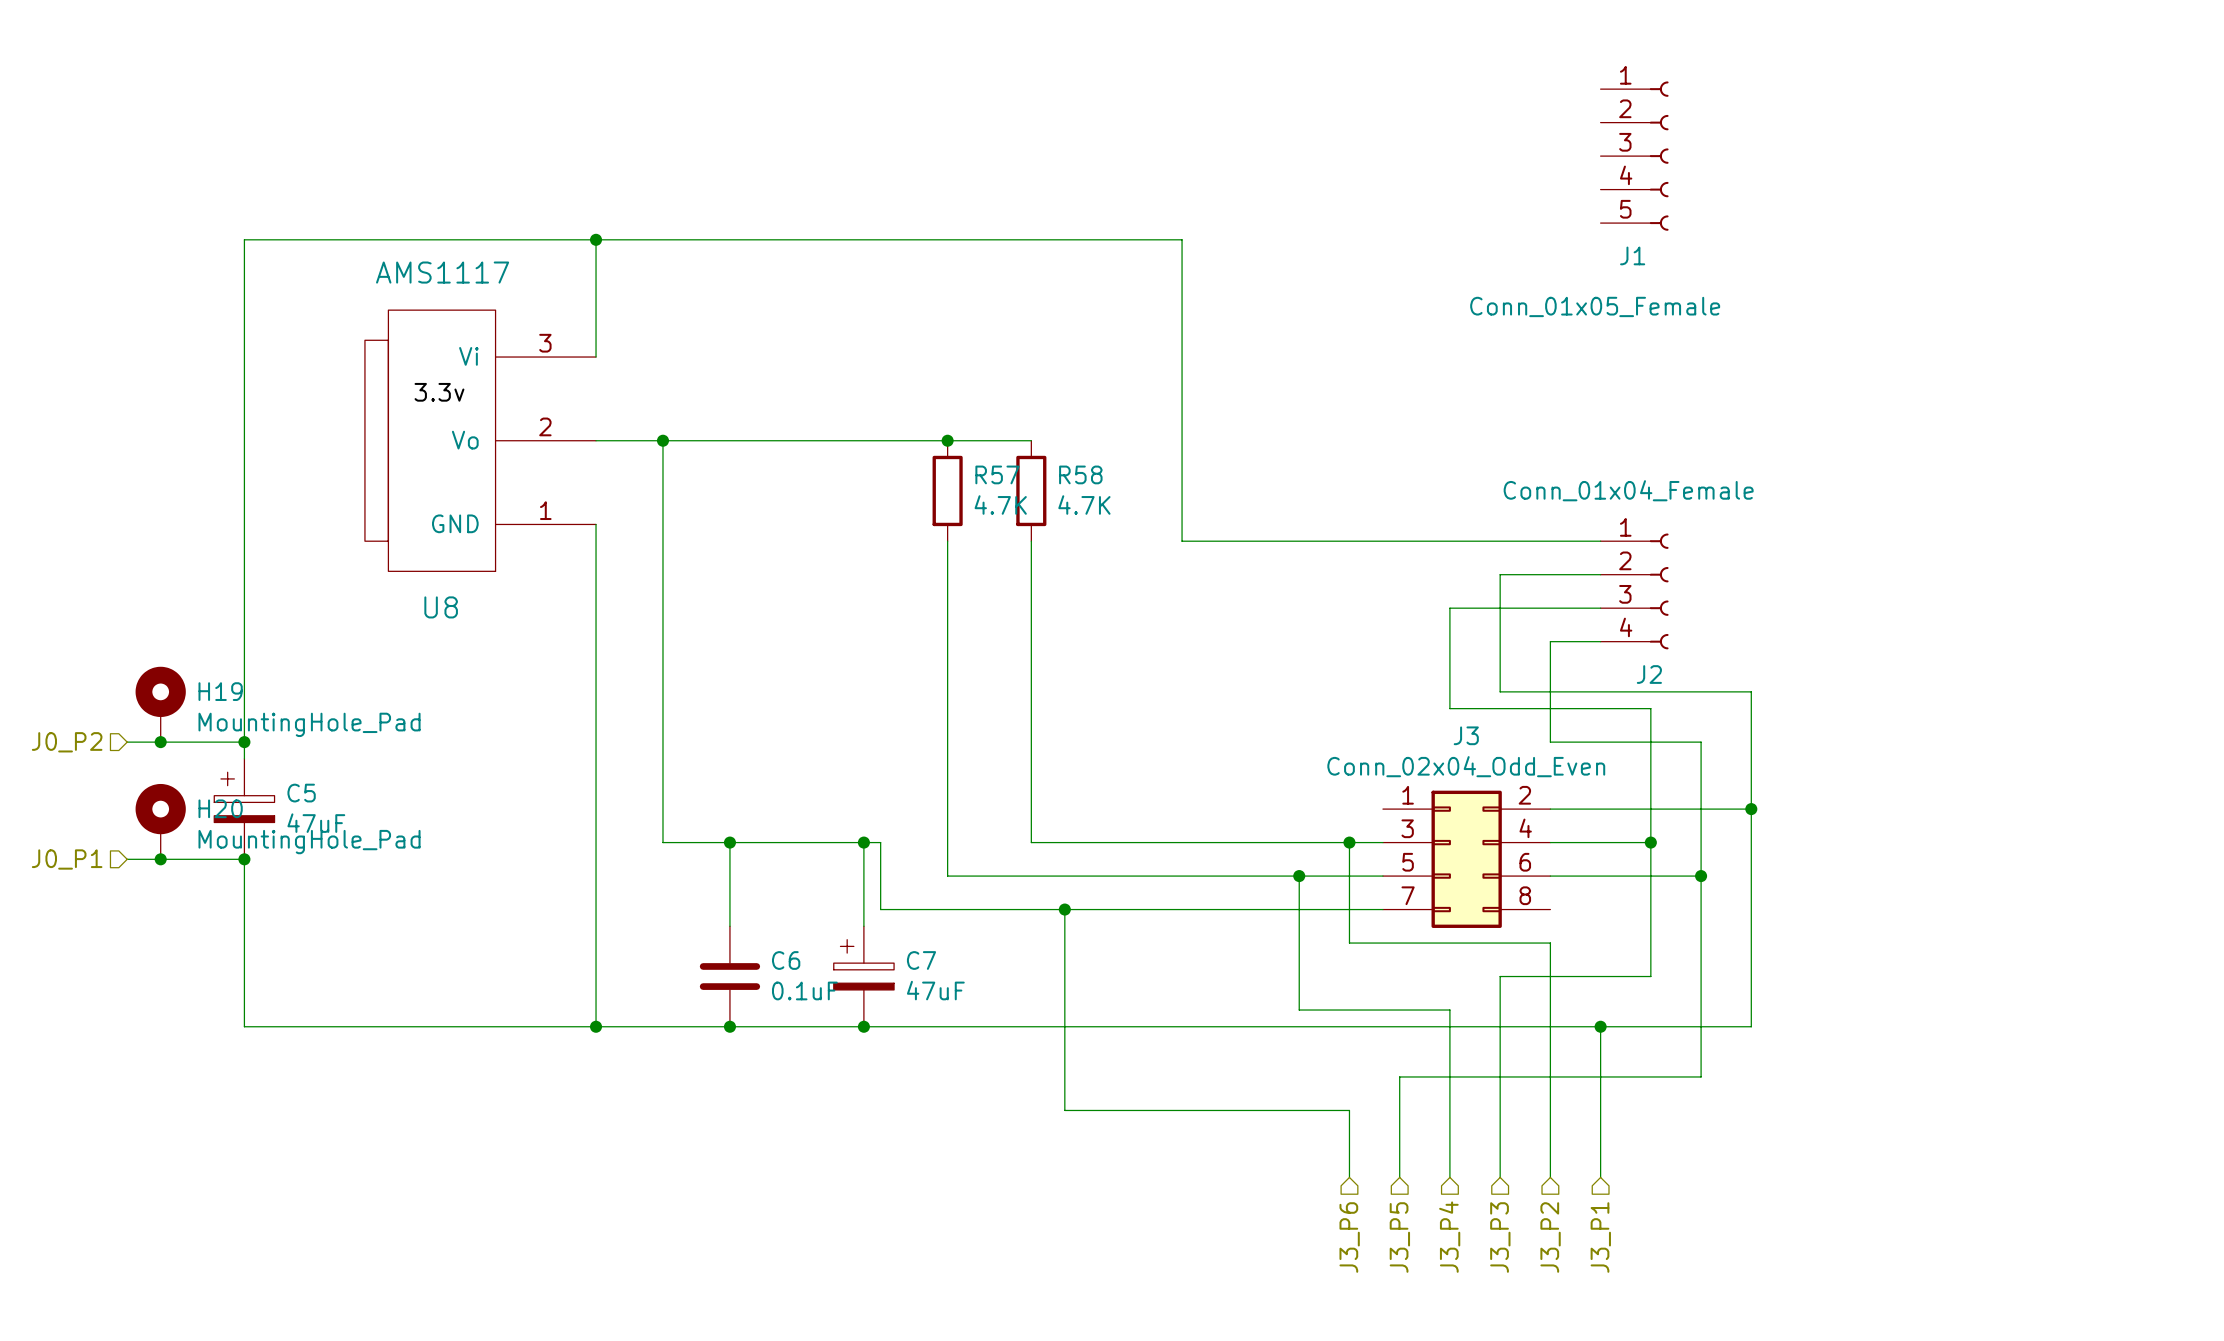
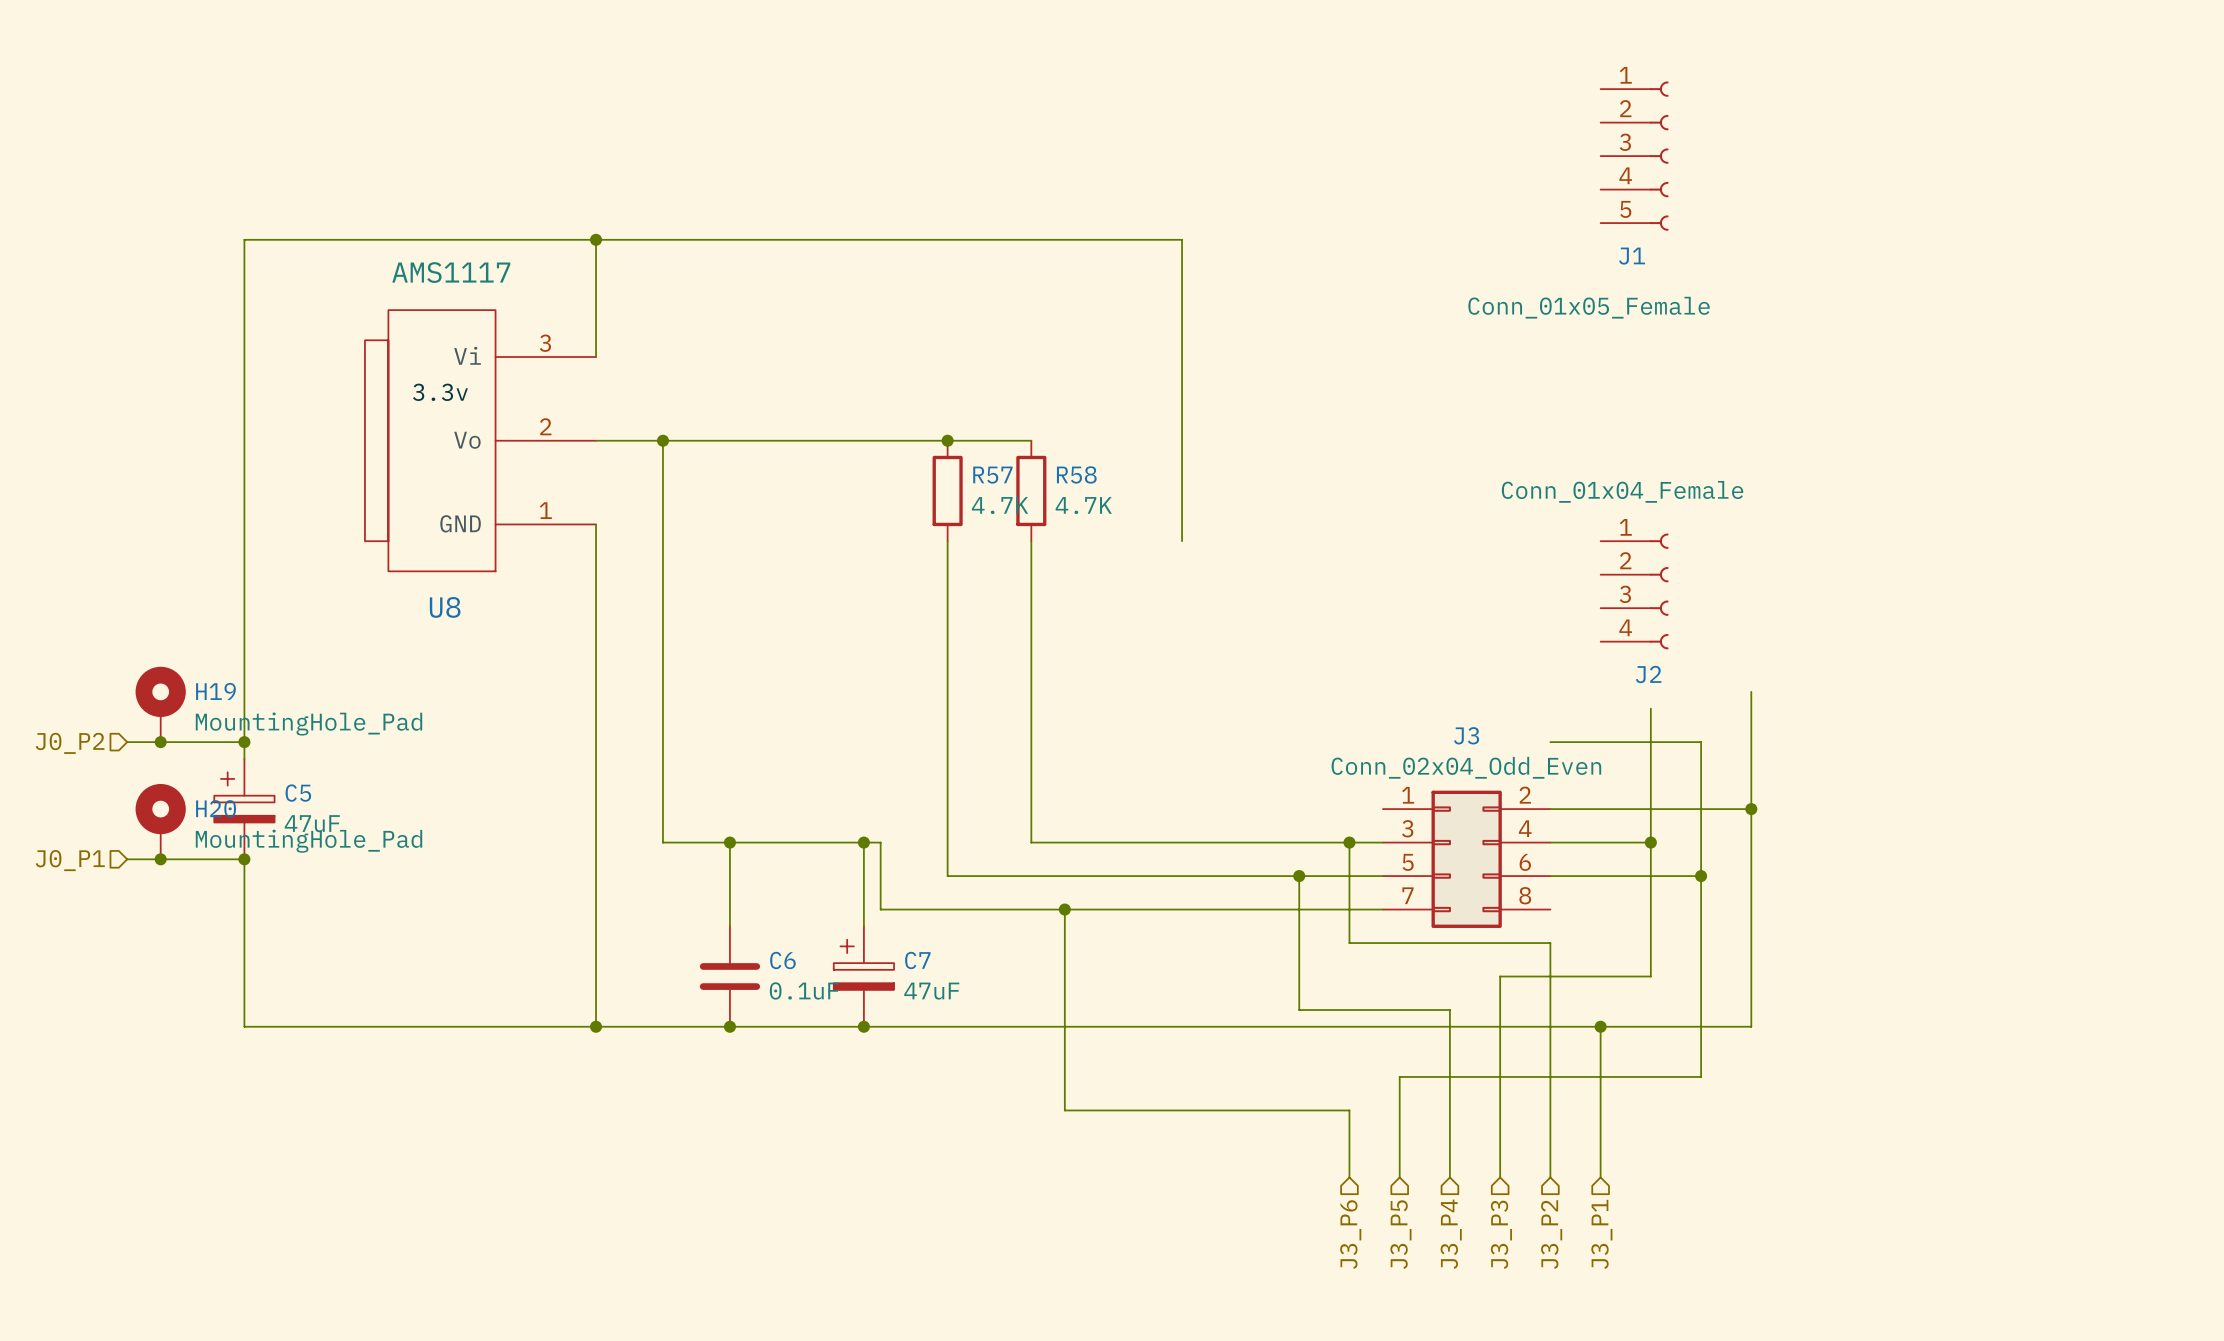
wire: (1182, 541) (1600, 541) -> none
wire: (1600, 574) (1500, 574) (1500, 691) (1751, 691) -> none
wire: (1600, 608) (1449, 608) (1449, 708) (1650, 708) -> none
wire: (1600, 641) (1550, 641) (1550, 742) -> none

